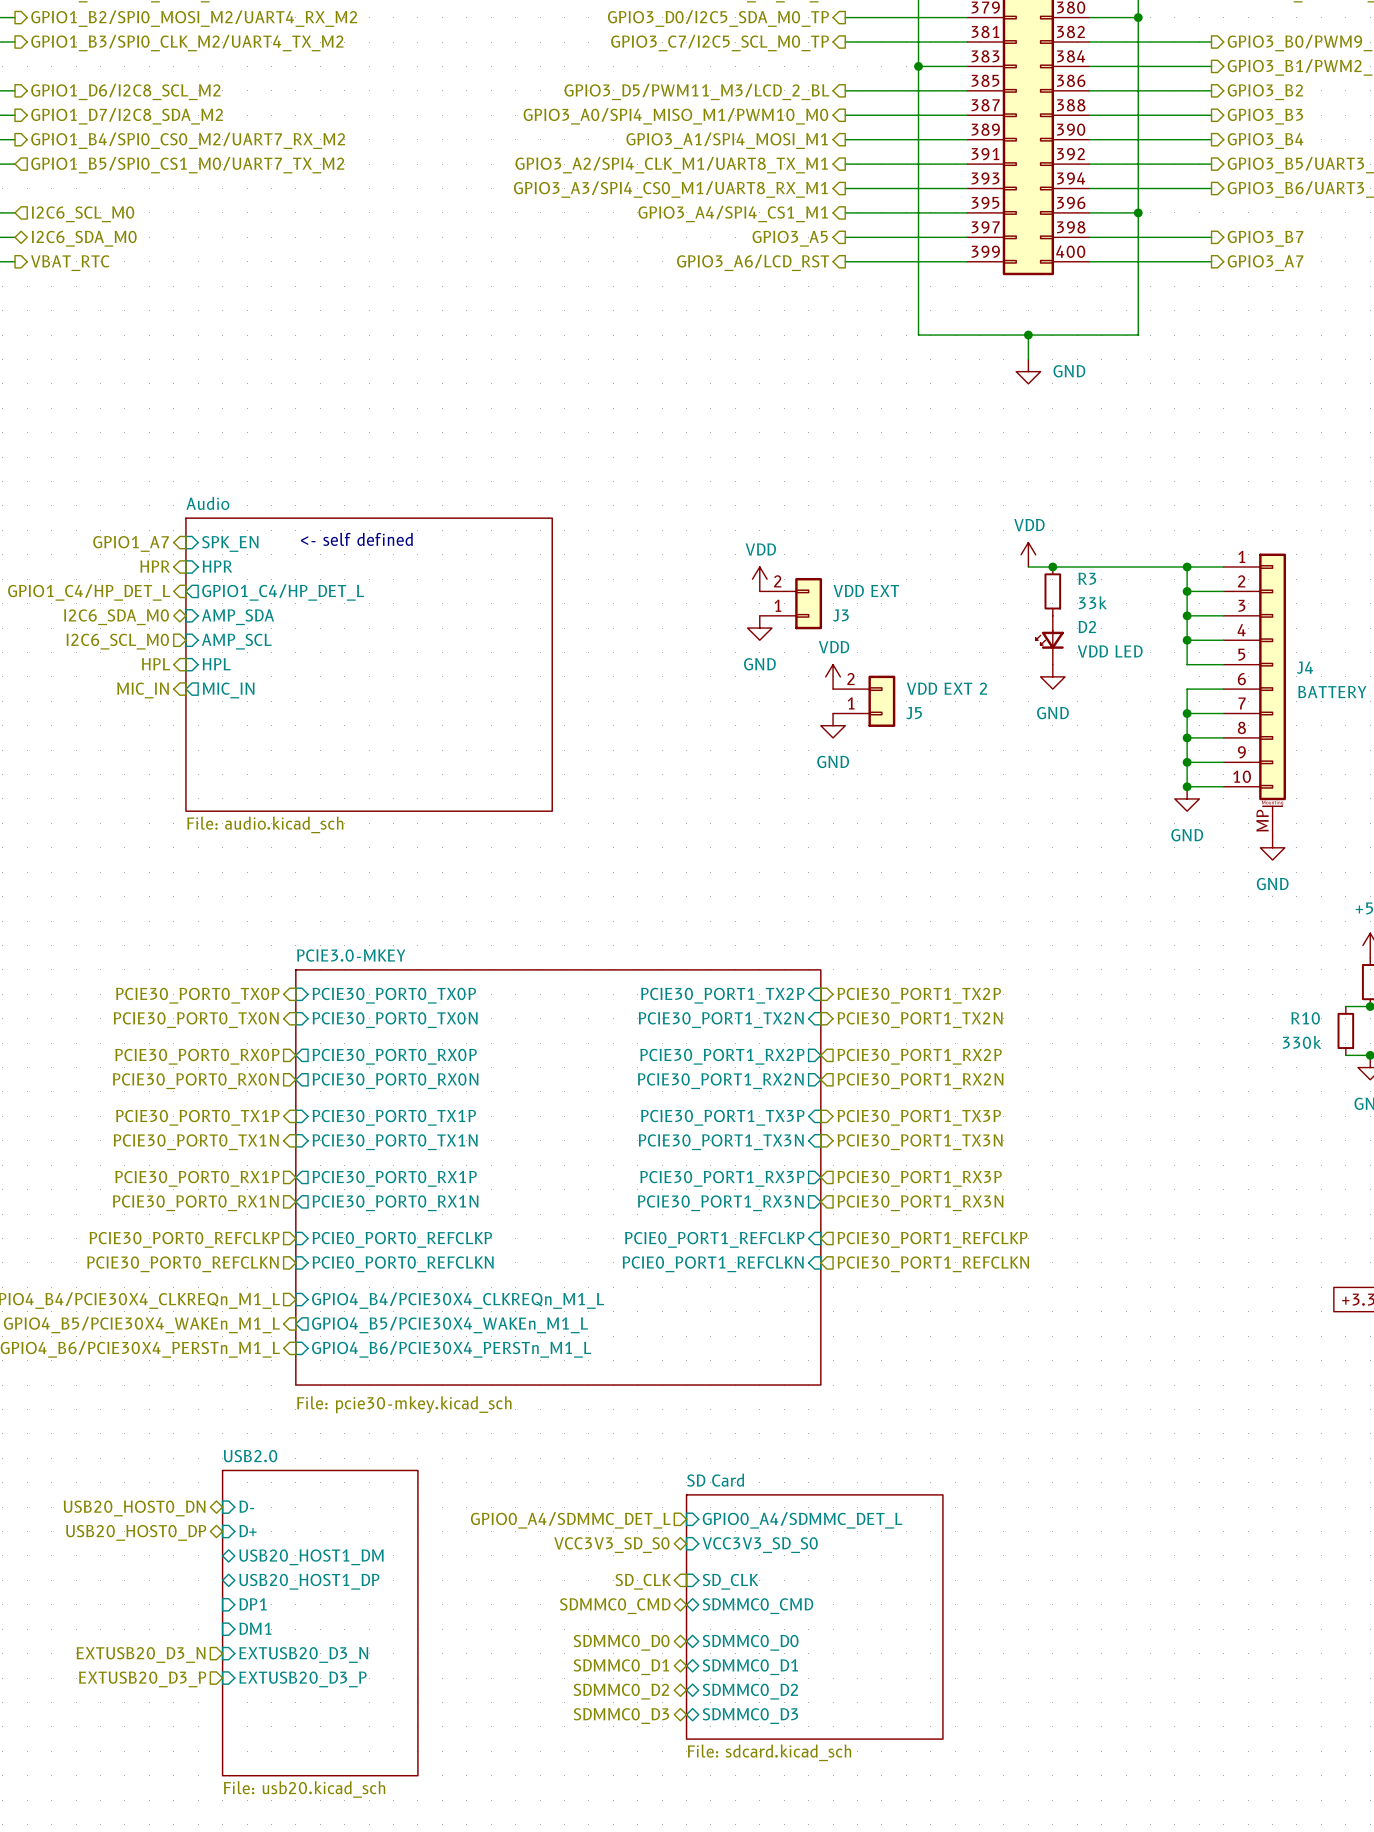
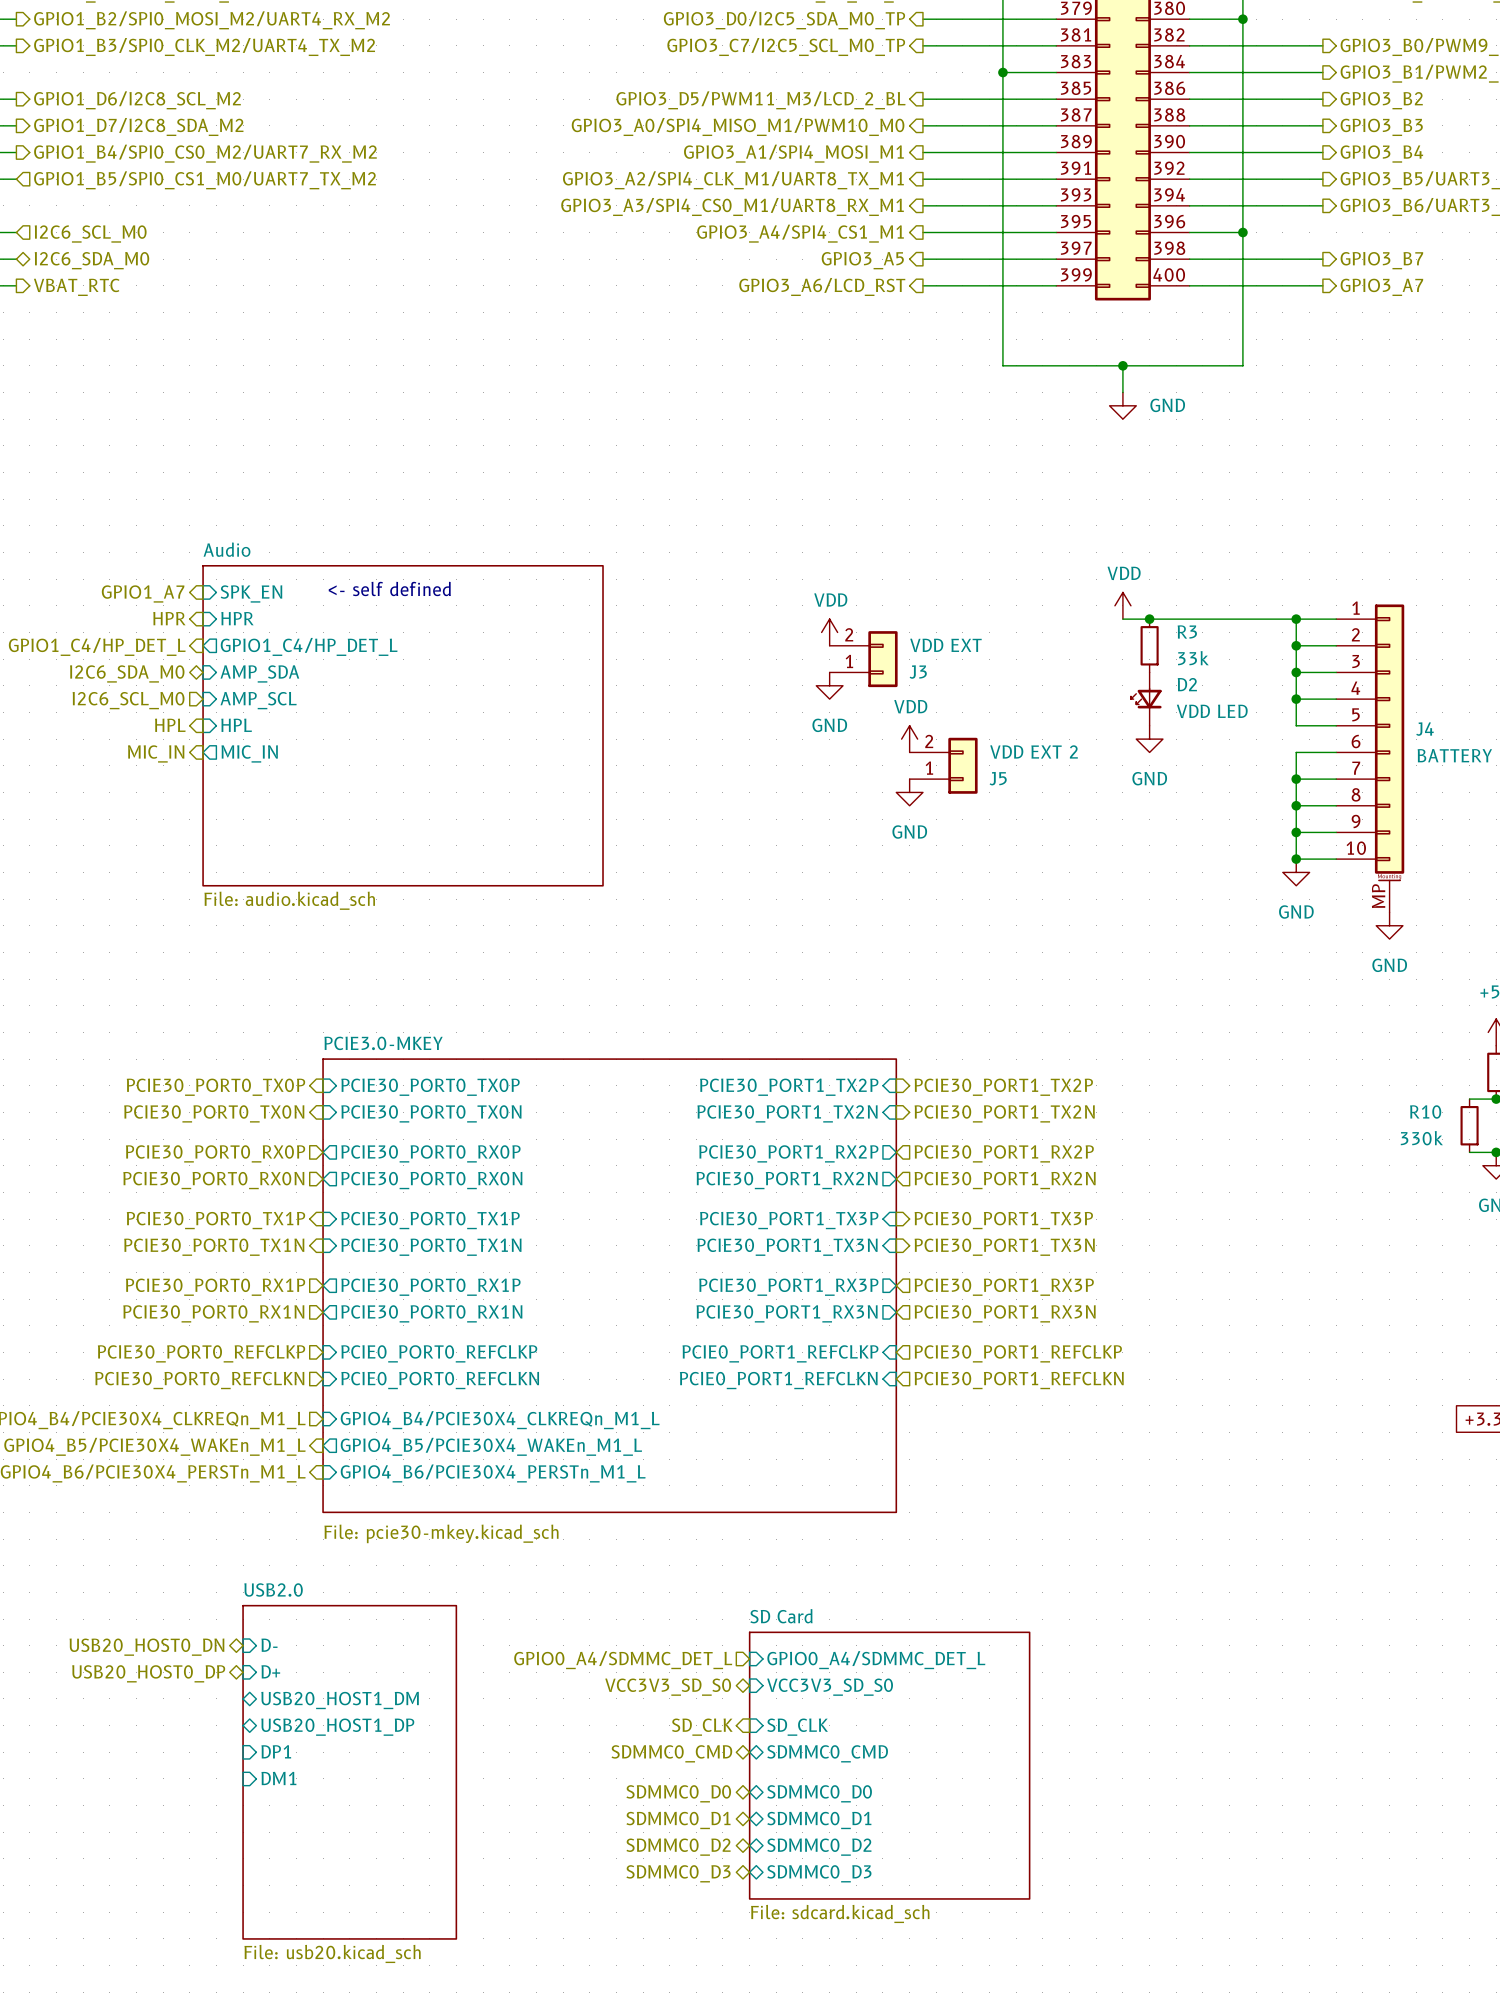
hierarchical label: EXTUSB20_D3_N (141, 1654) -> none
sheet pin: EXTUSB20_D3_N (303, 1654) -> none
hierarchical label: EXTUSB20_D3_P (142, 1679) -> none
sheet pin: EXTUSB20_D3_P (302, 1679) -> none

